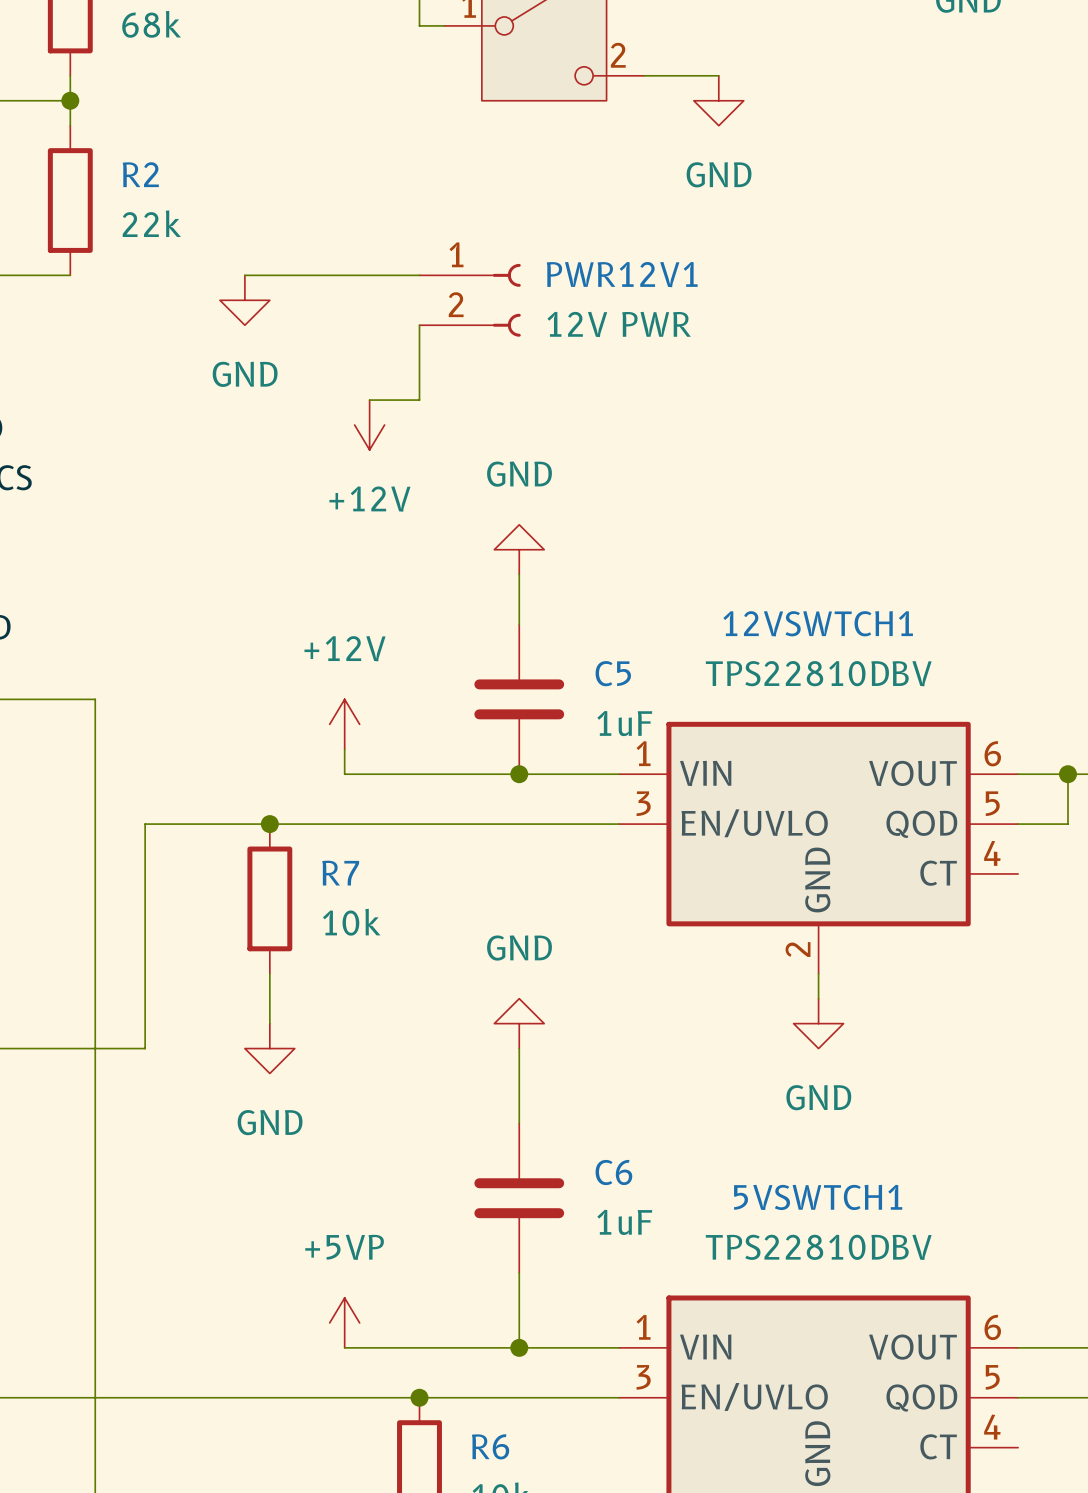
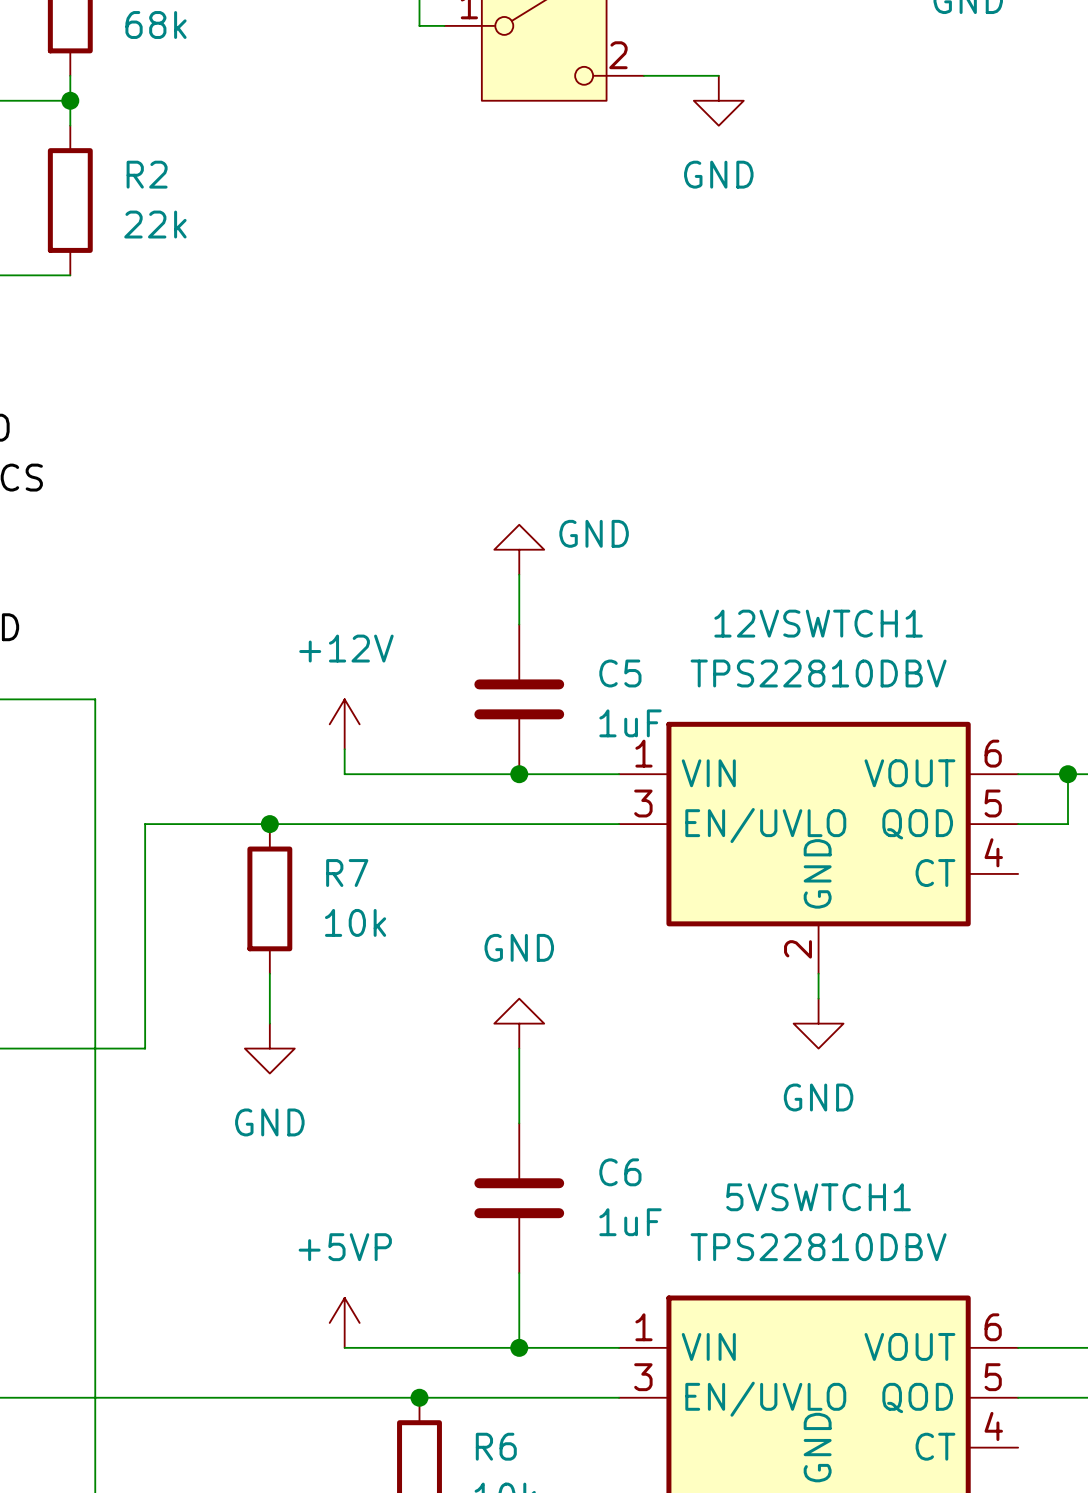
wire: (244, 275) (419, 275) -> none
power symbol: GND (244, 300) -> none
PWR12V1: 12V PWR (470, 300) -> none
wire: (419, 325) (419, 400) (369, 400) -> none
power symbol: +12V (369, 425) -> none
power symbol text position: GND (519, 474) -> GND (594, 533)

